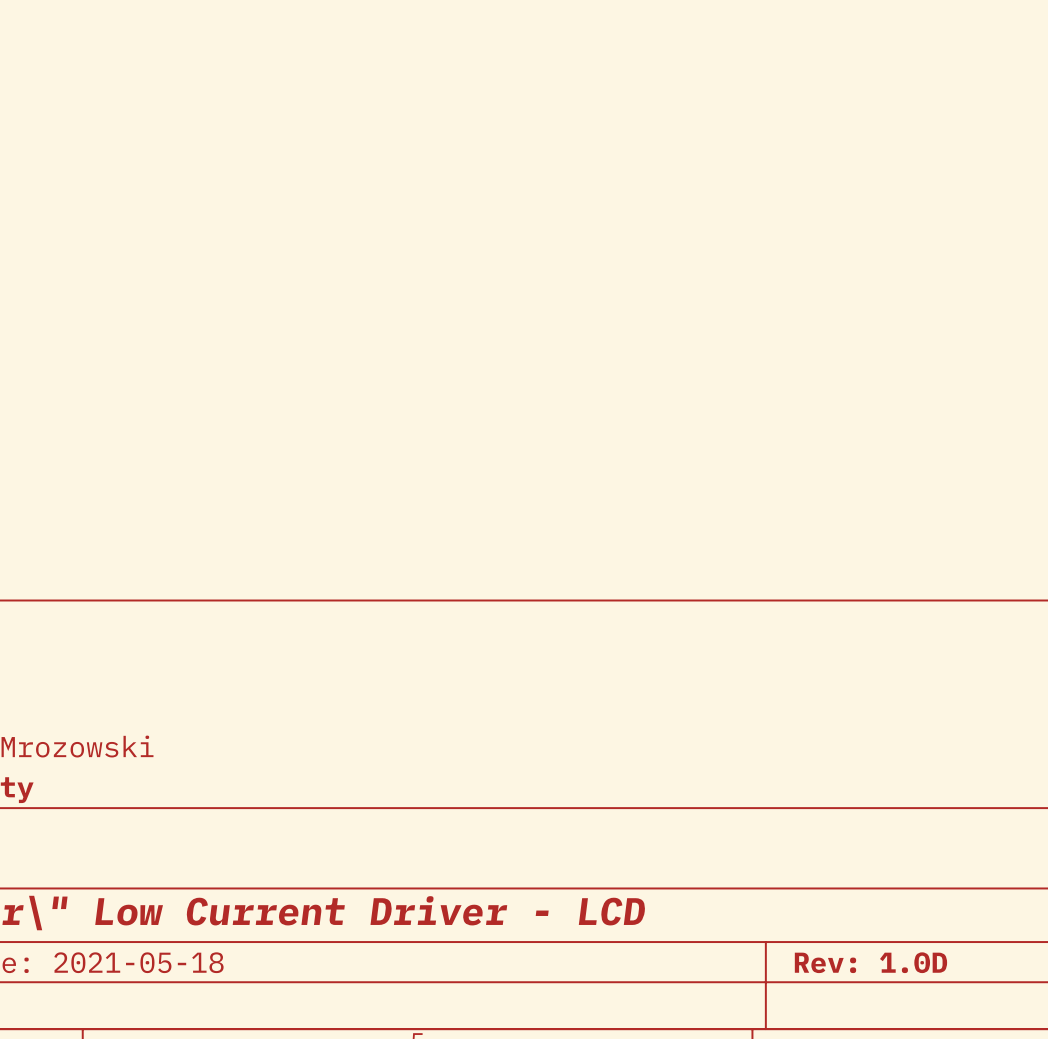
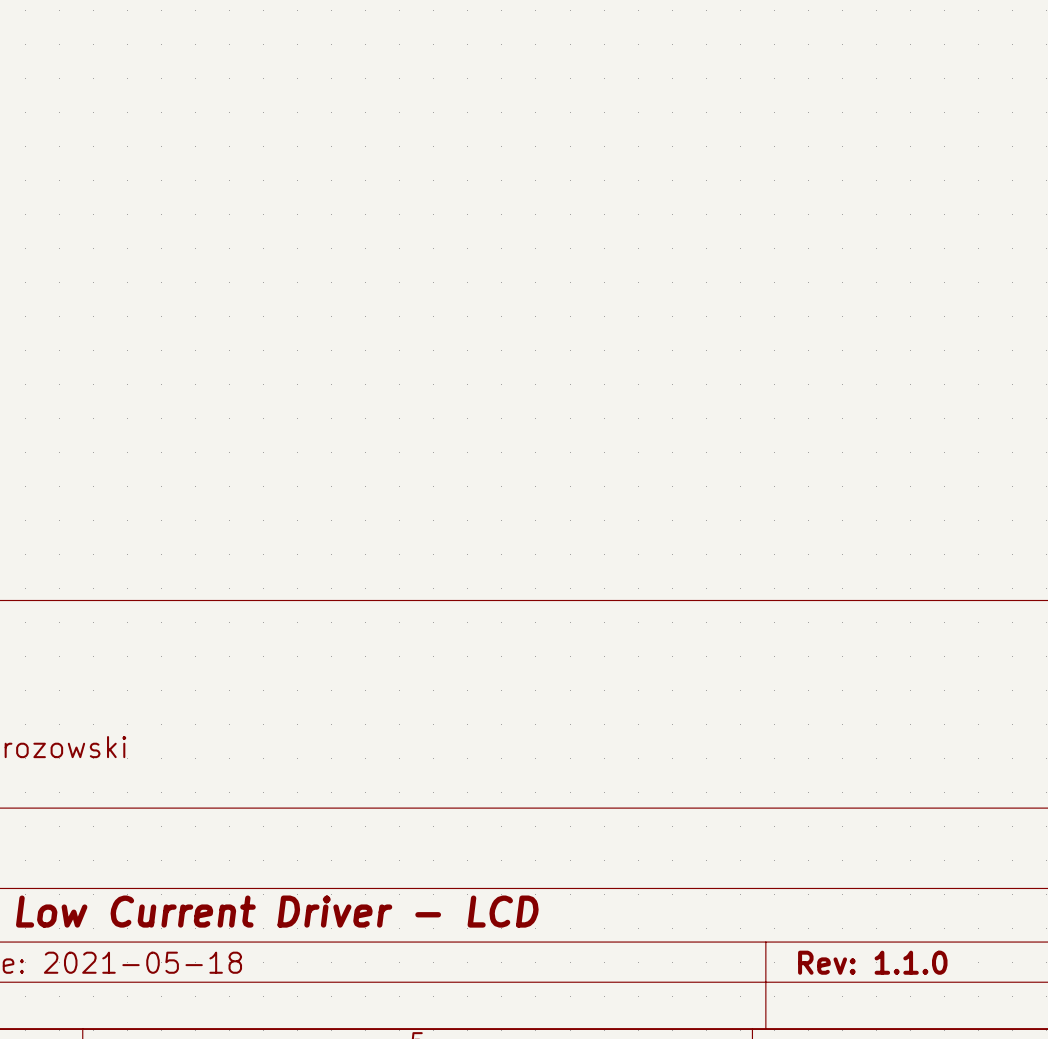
title block: Rev: 1.0D (870, 962) -> Rev: 1.1.0 (872, 962)

